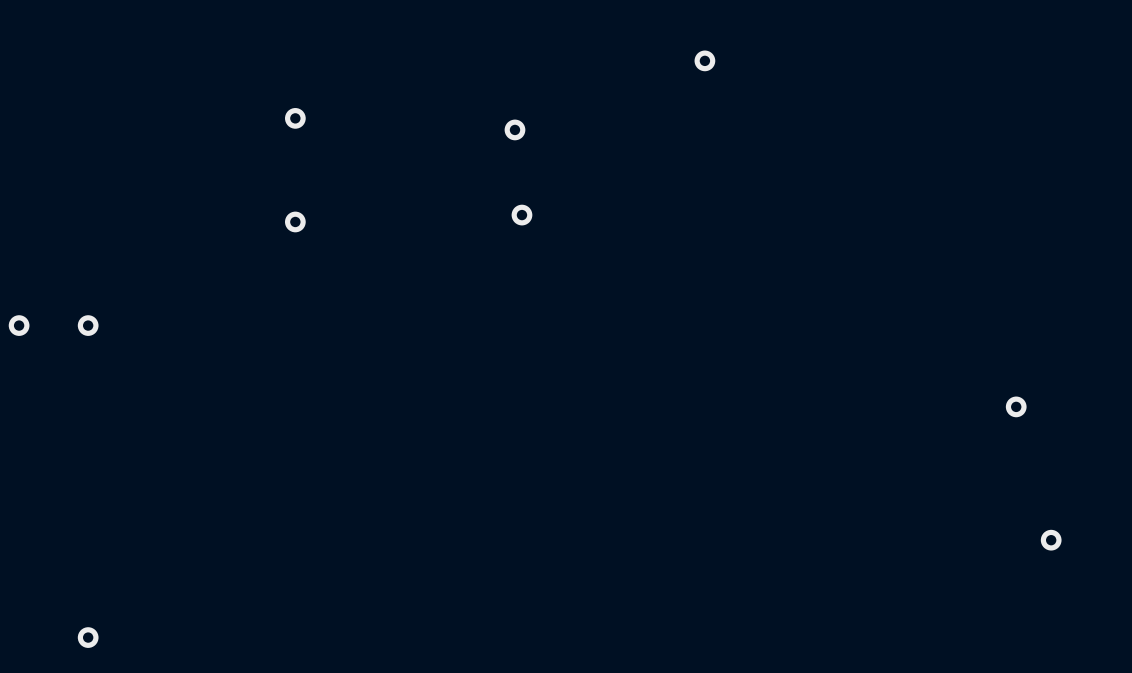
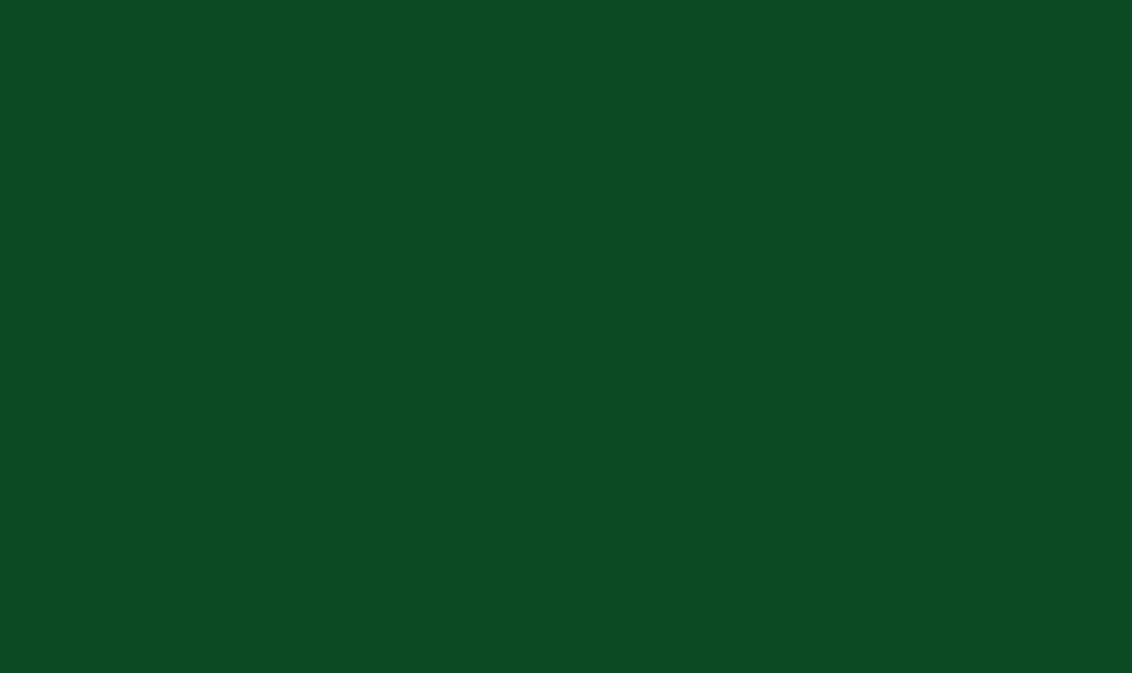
via: (704, 60) -> none
via: (295, 118) -> none
via: (514, 129) -> none
via: (521, 215) -> none
via: (295, 221) -> none
via: (19, 325) -> none
via: (88, 325) -> none
via: (1016, 406) -> none
via: (1051, 540) -> none
via: (88, 637) -> none

